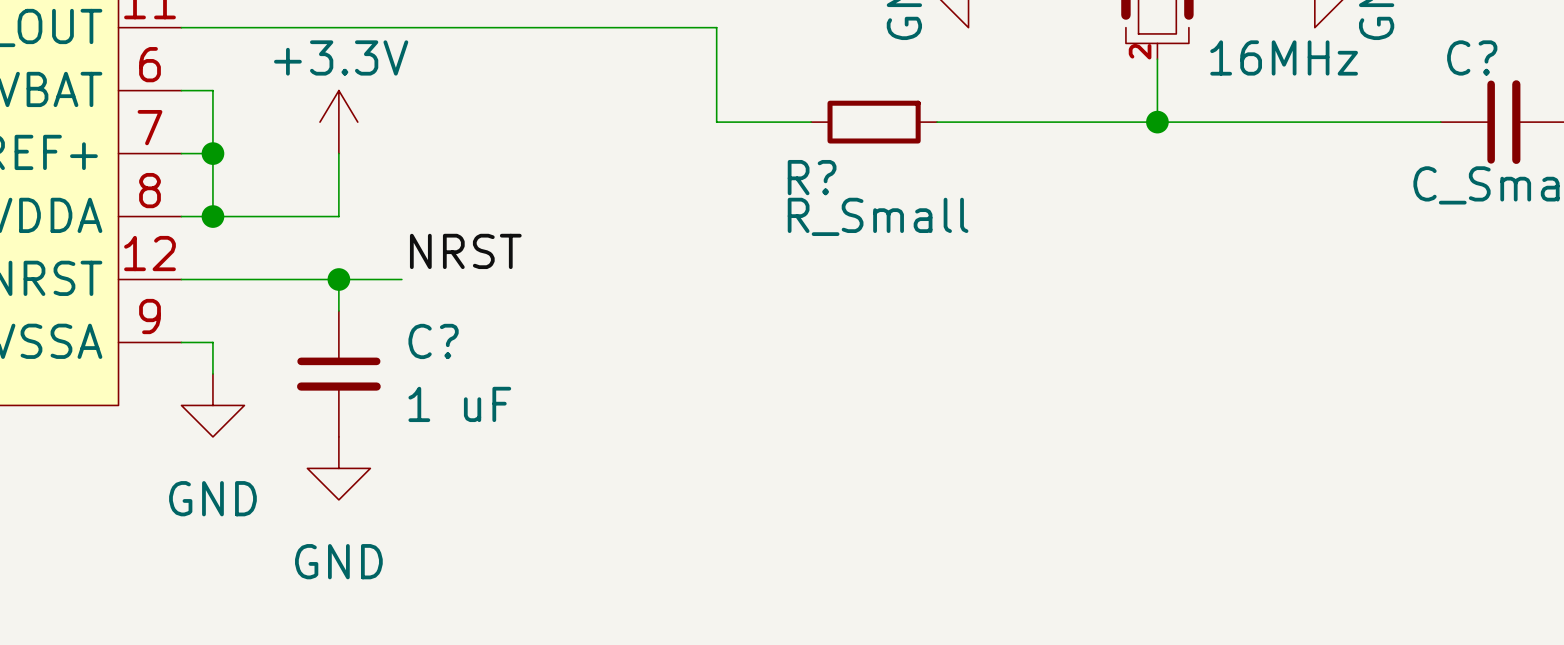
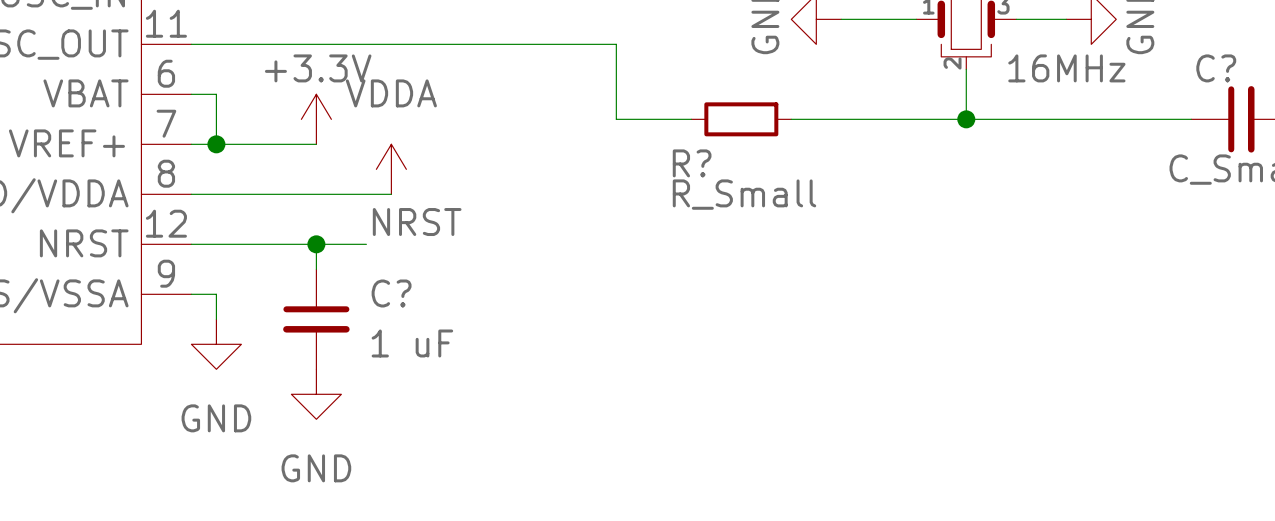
wire: (212, 153) (212, 216) -> (216, 144) (316, 144)
wire: (338, 153) (338, 216) -> (391, 194) (316, 194)
power symbol: none -> VDDA (391, 169)
junction: (212, 216) -> none

